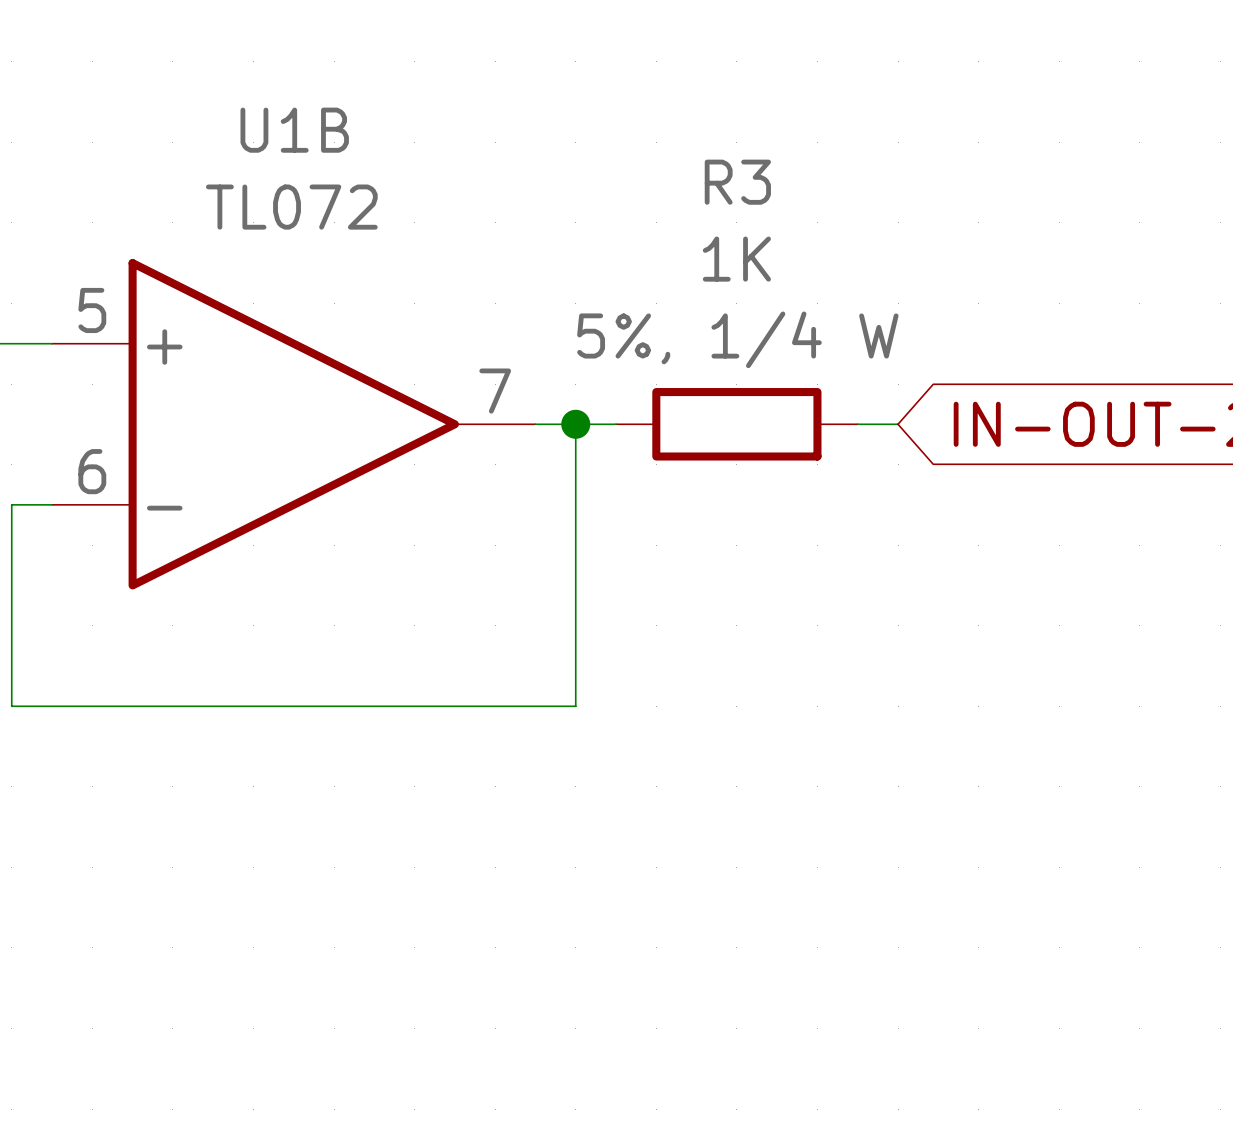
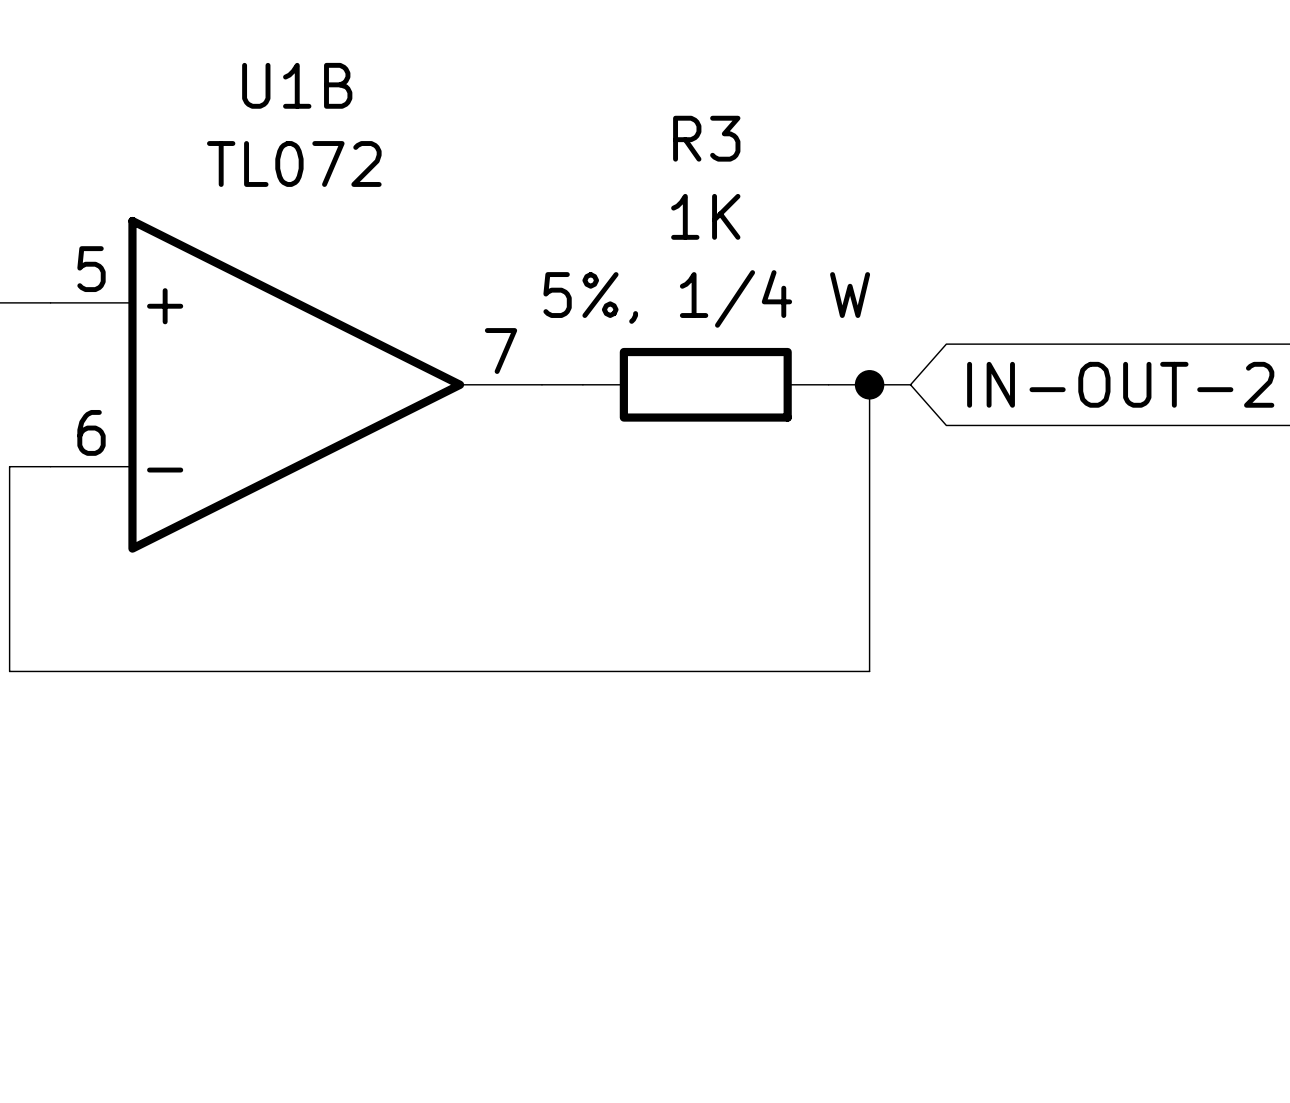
junction: (575, 424) -> none
wire: (616, 424) (575, 424) (575, 706) -> (828, 384) (869, 384) (869, 671) (582, 671)
R3 position: (736, 424) -> (705, 384)
junction: none -> (869, 384)

